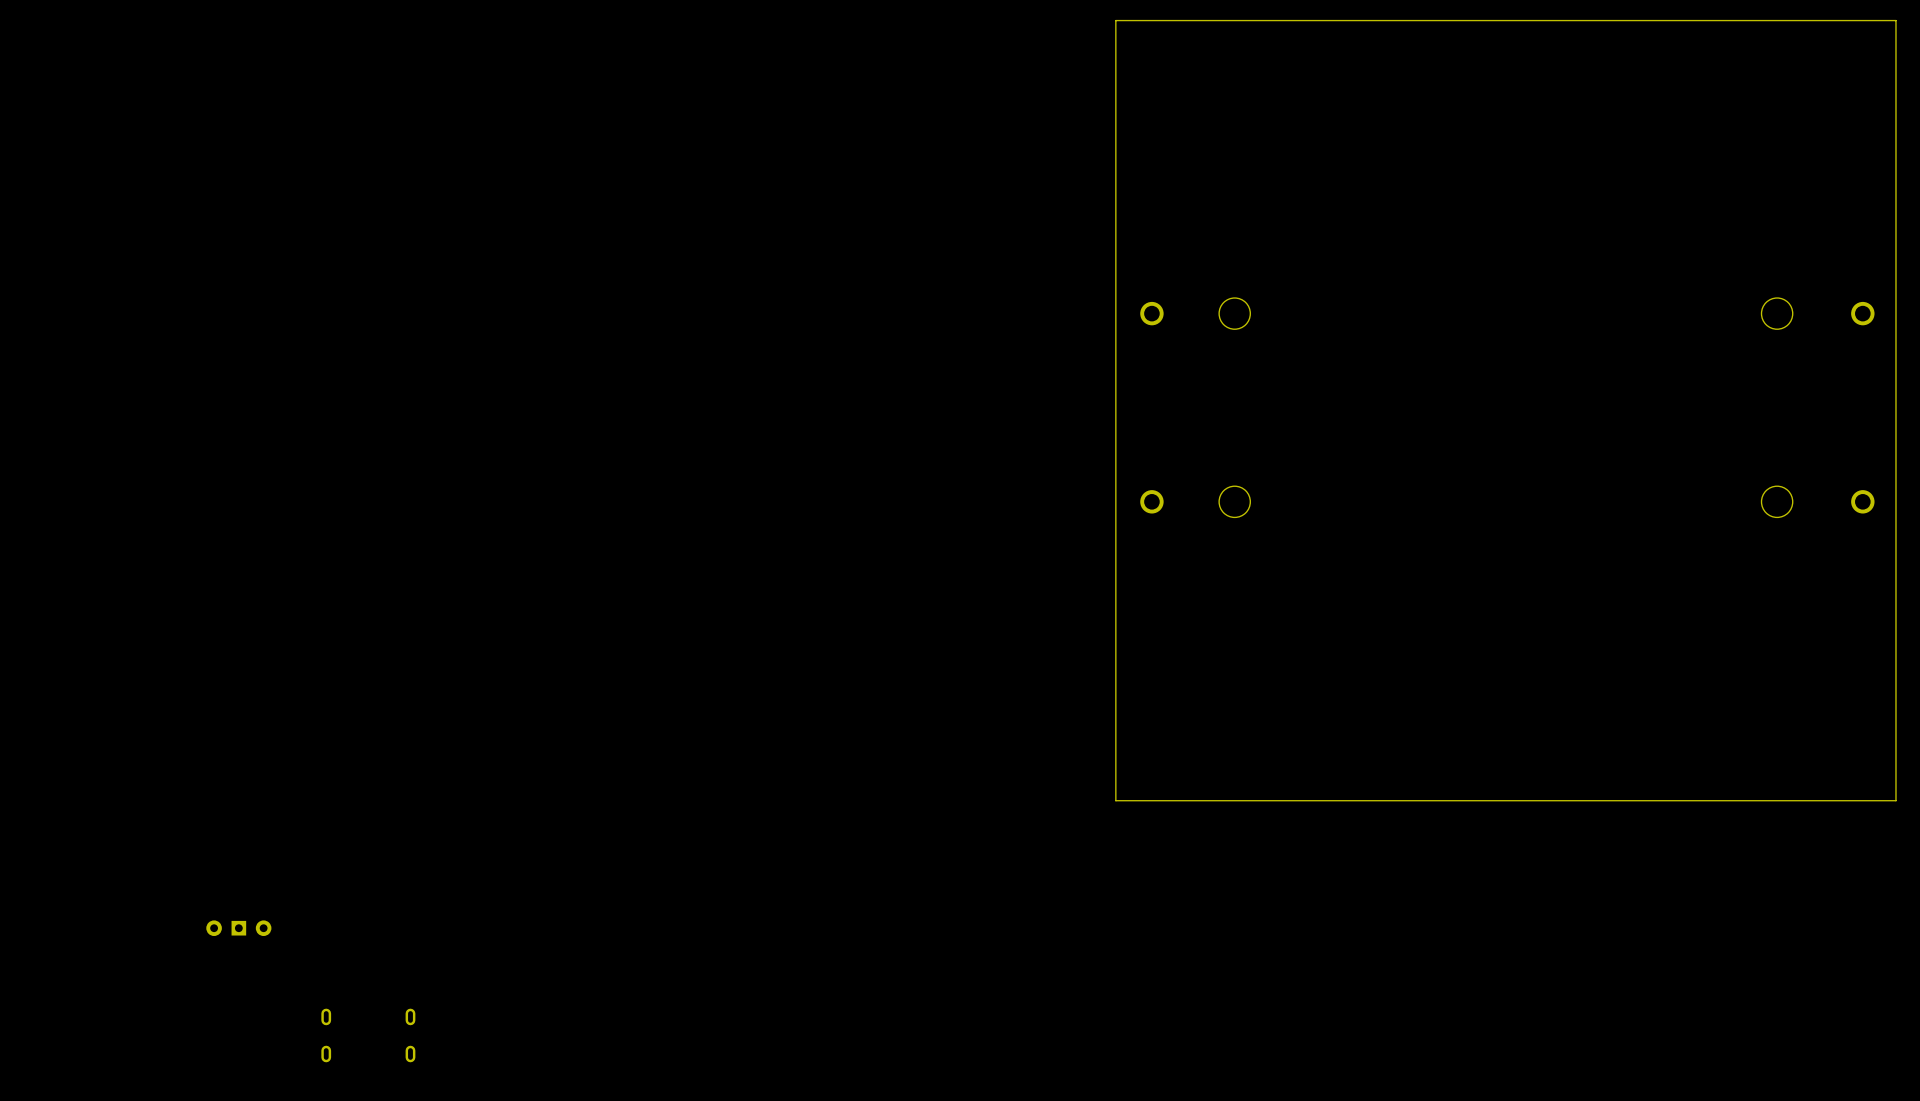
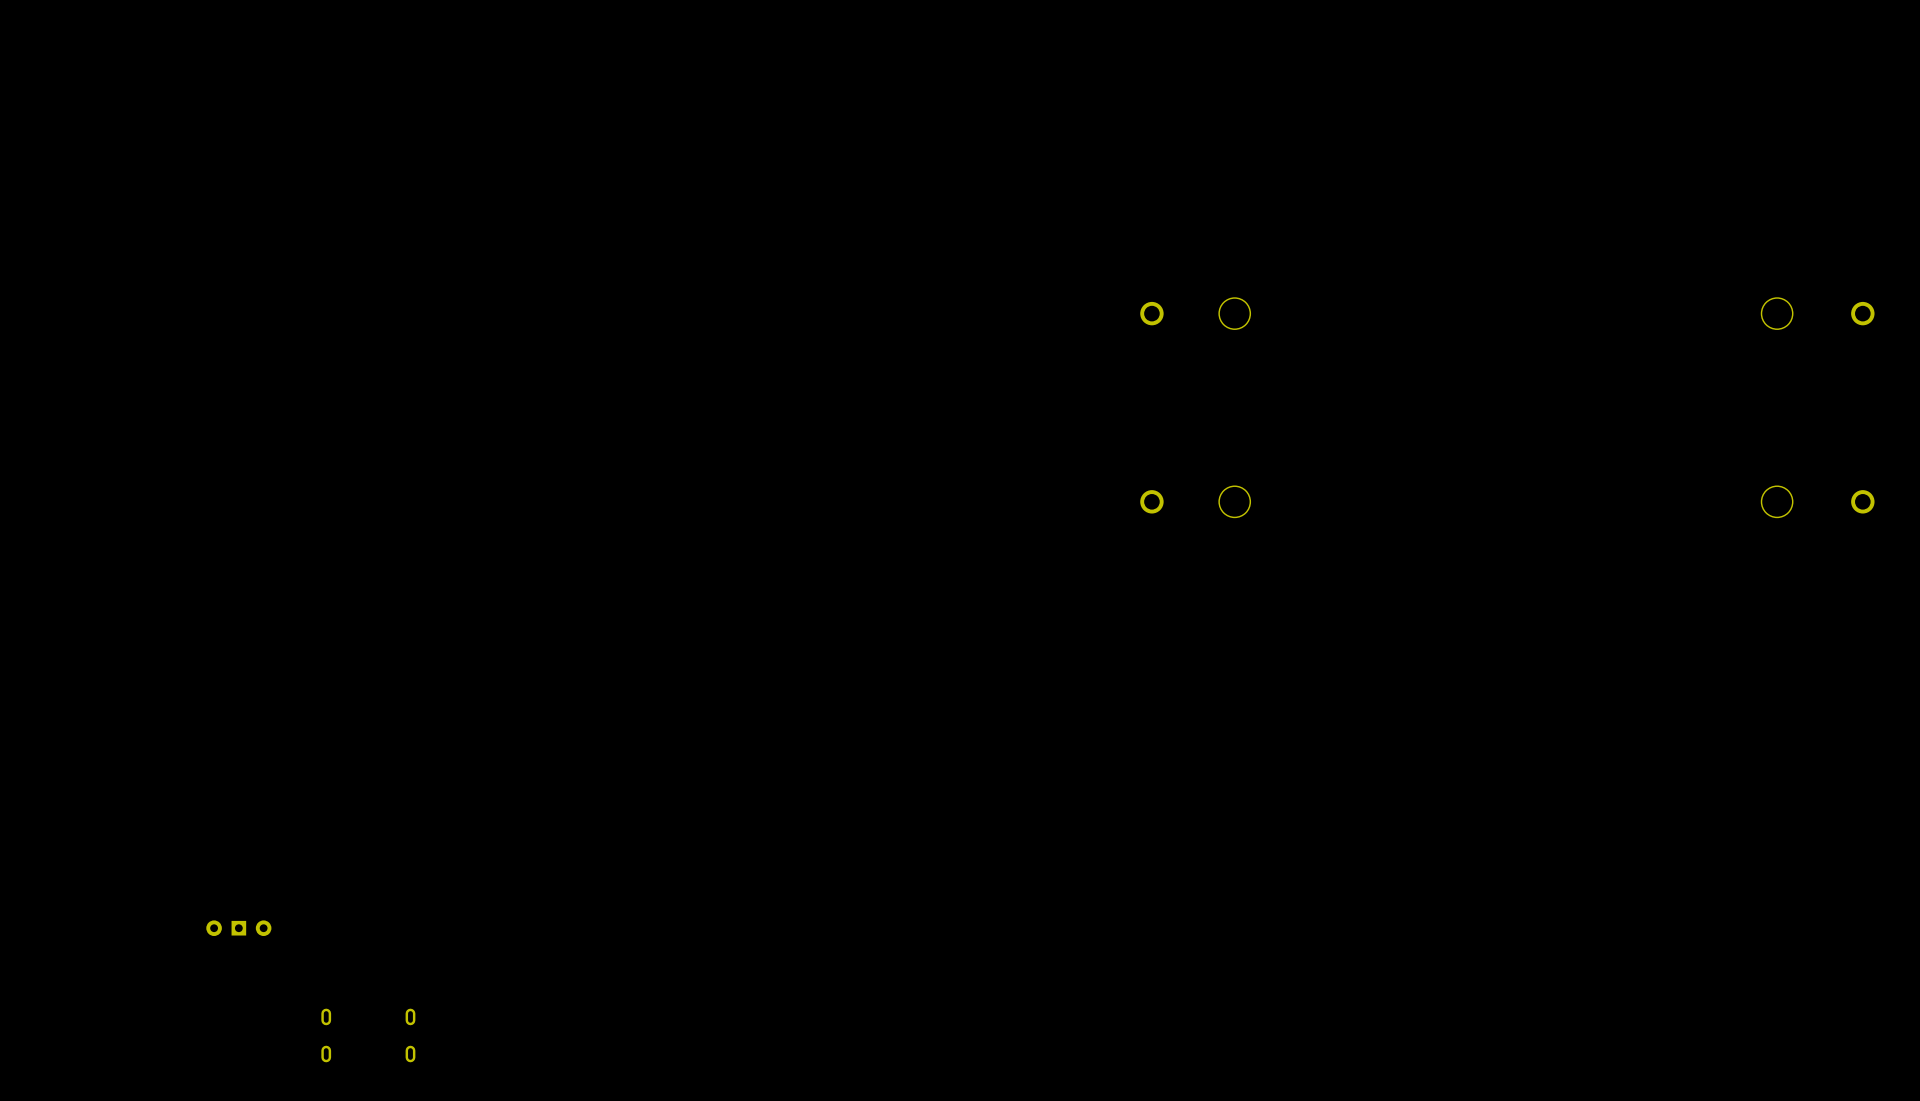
board edge: (1895, 20) (1115, 20) (1115, 800) (1895, 800) (1895, 20) -> none

